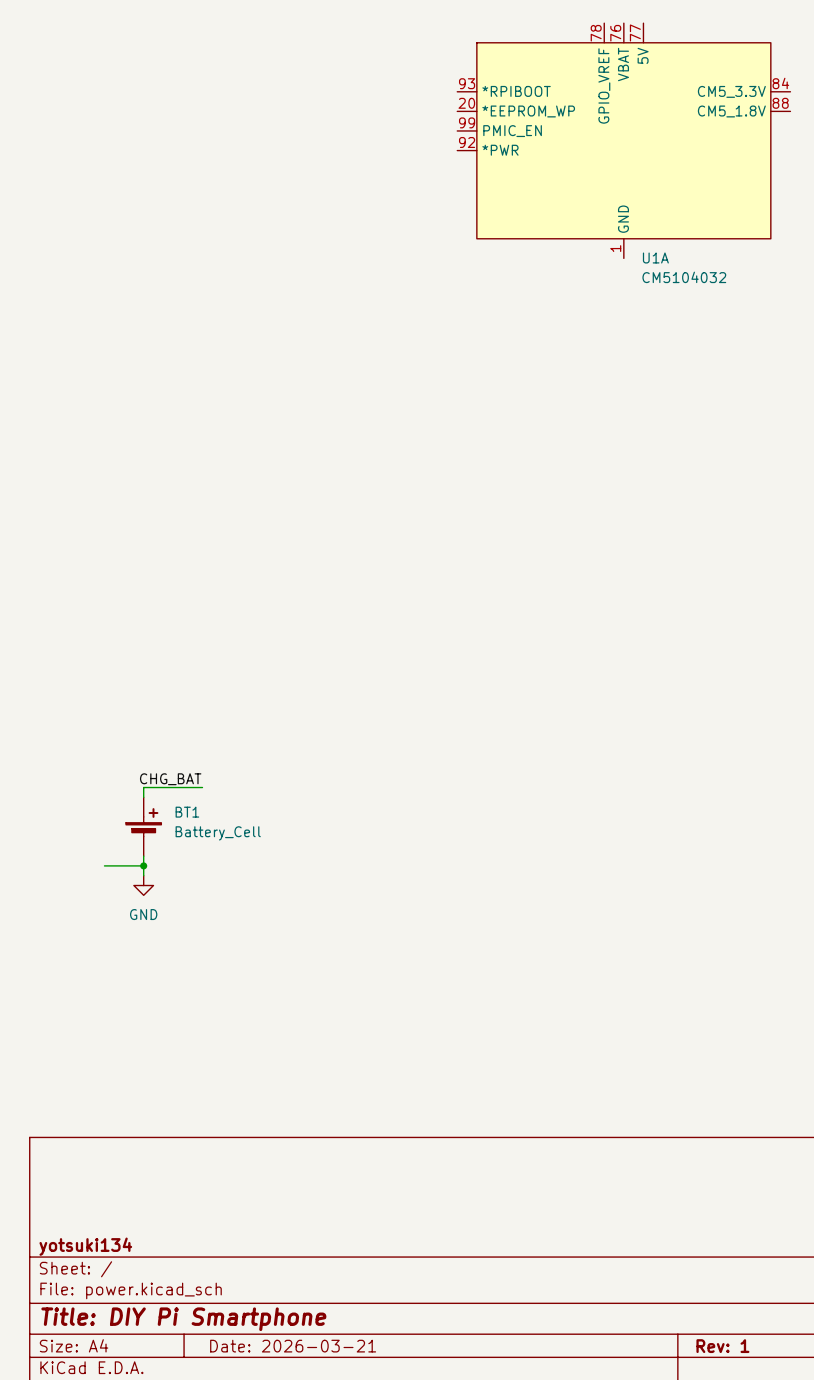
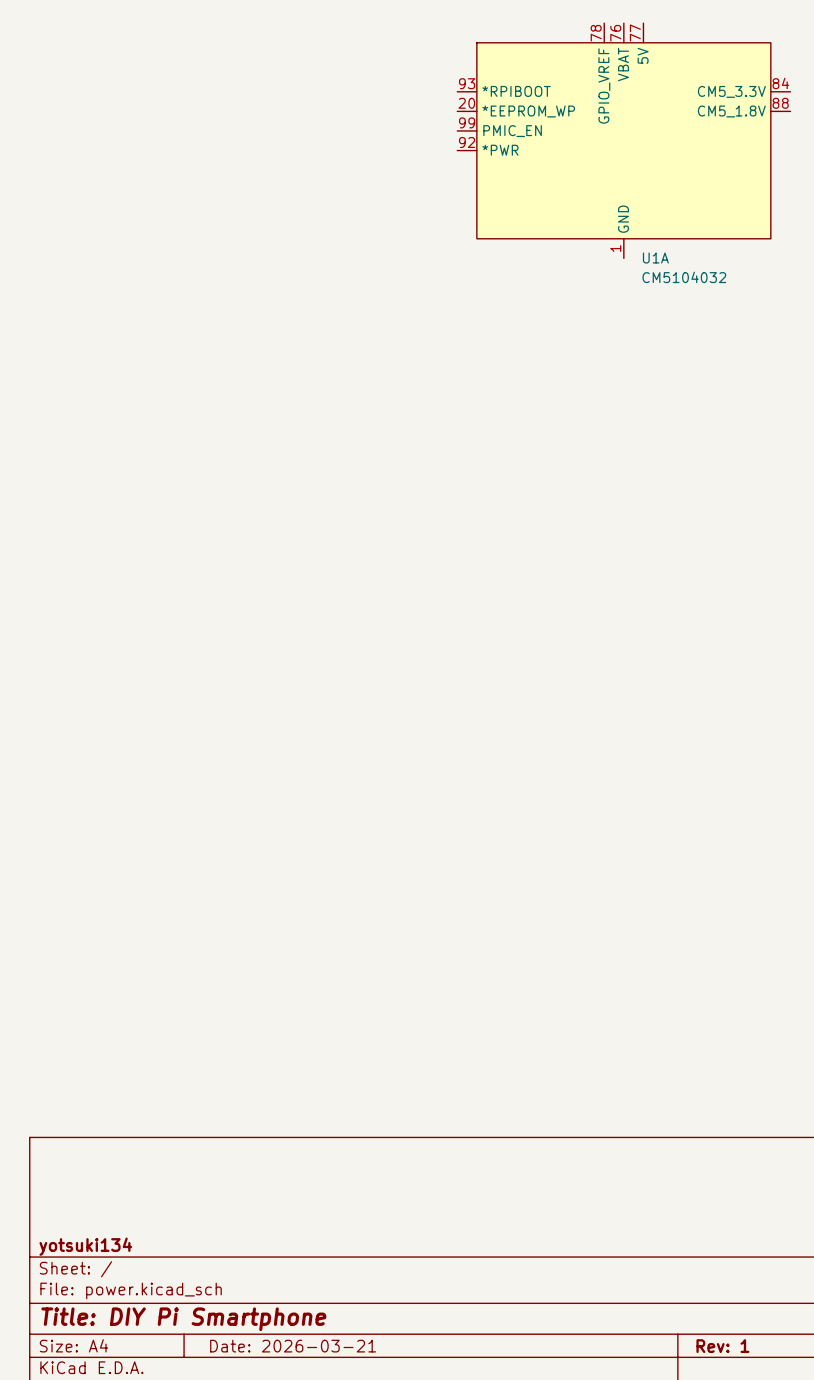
label: CHG_BAT (170, 779) -> none
wire: (202, 787) (143, 787) (143, 797) -> none
BT1: Battery_Cell (143, 826) -> none
wire: (143, 856) (143, 875) -> none
wire: (104, 865) (143, 865) -> none
junction: (143, 865) -> none
power symbol: GND (143, 885) -> none

